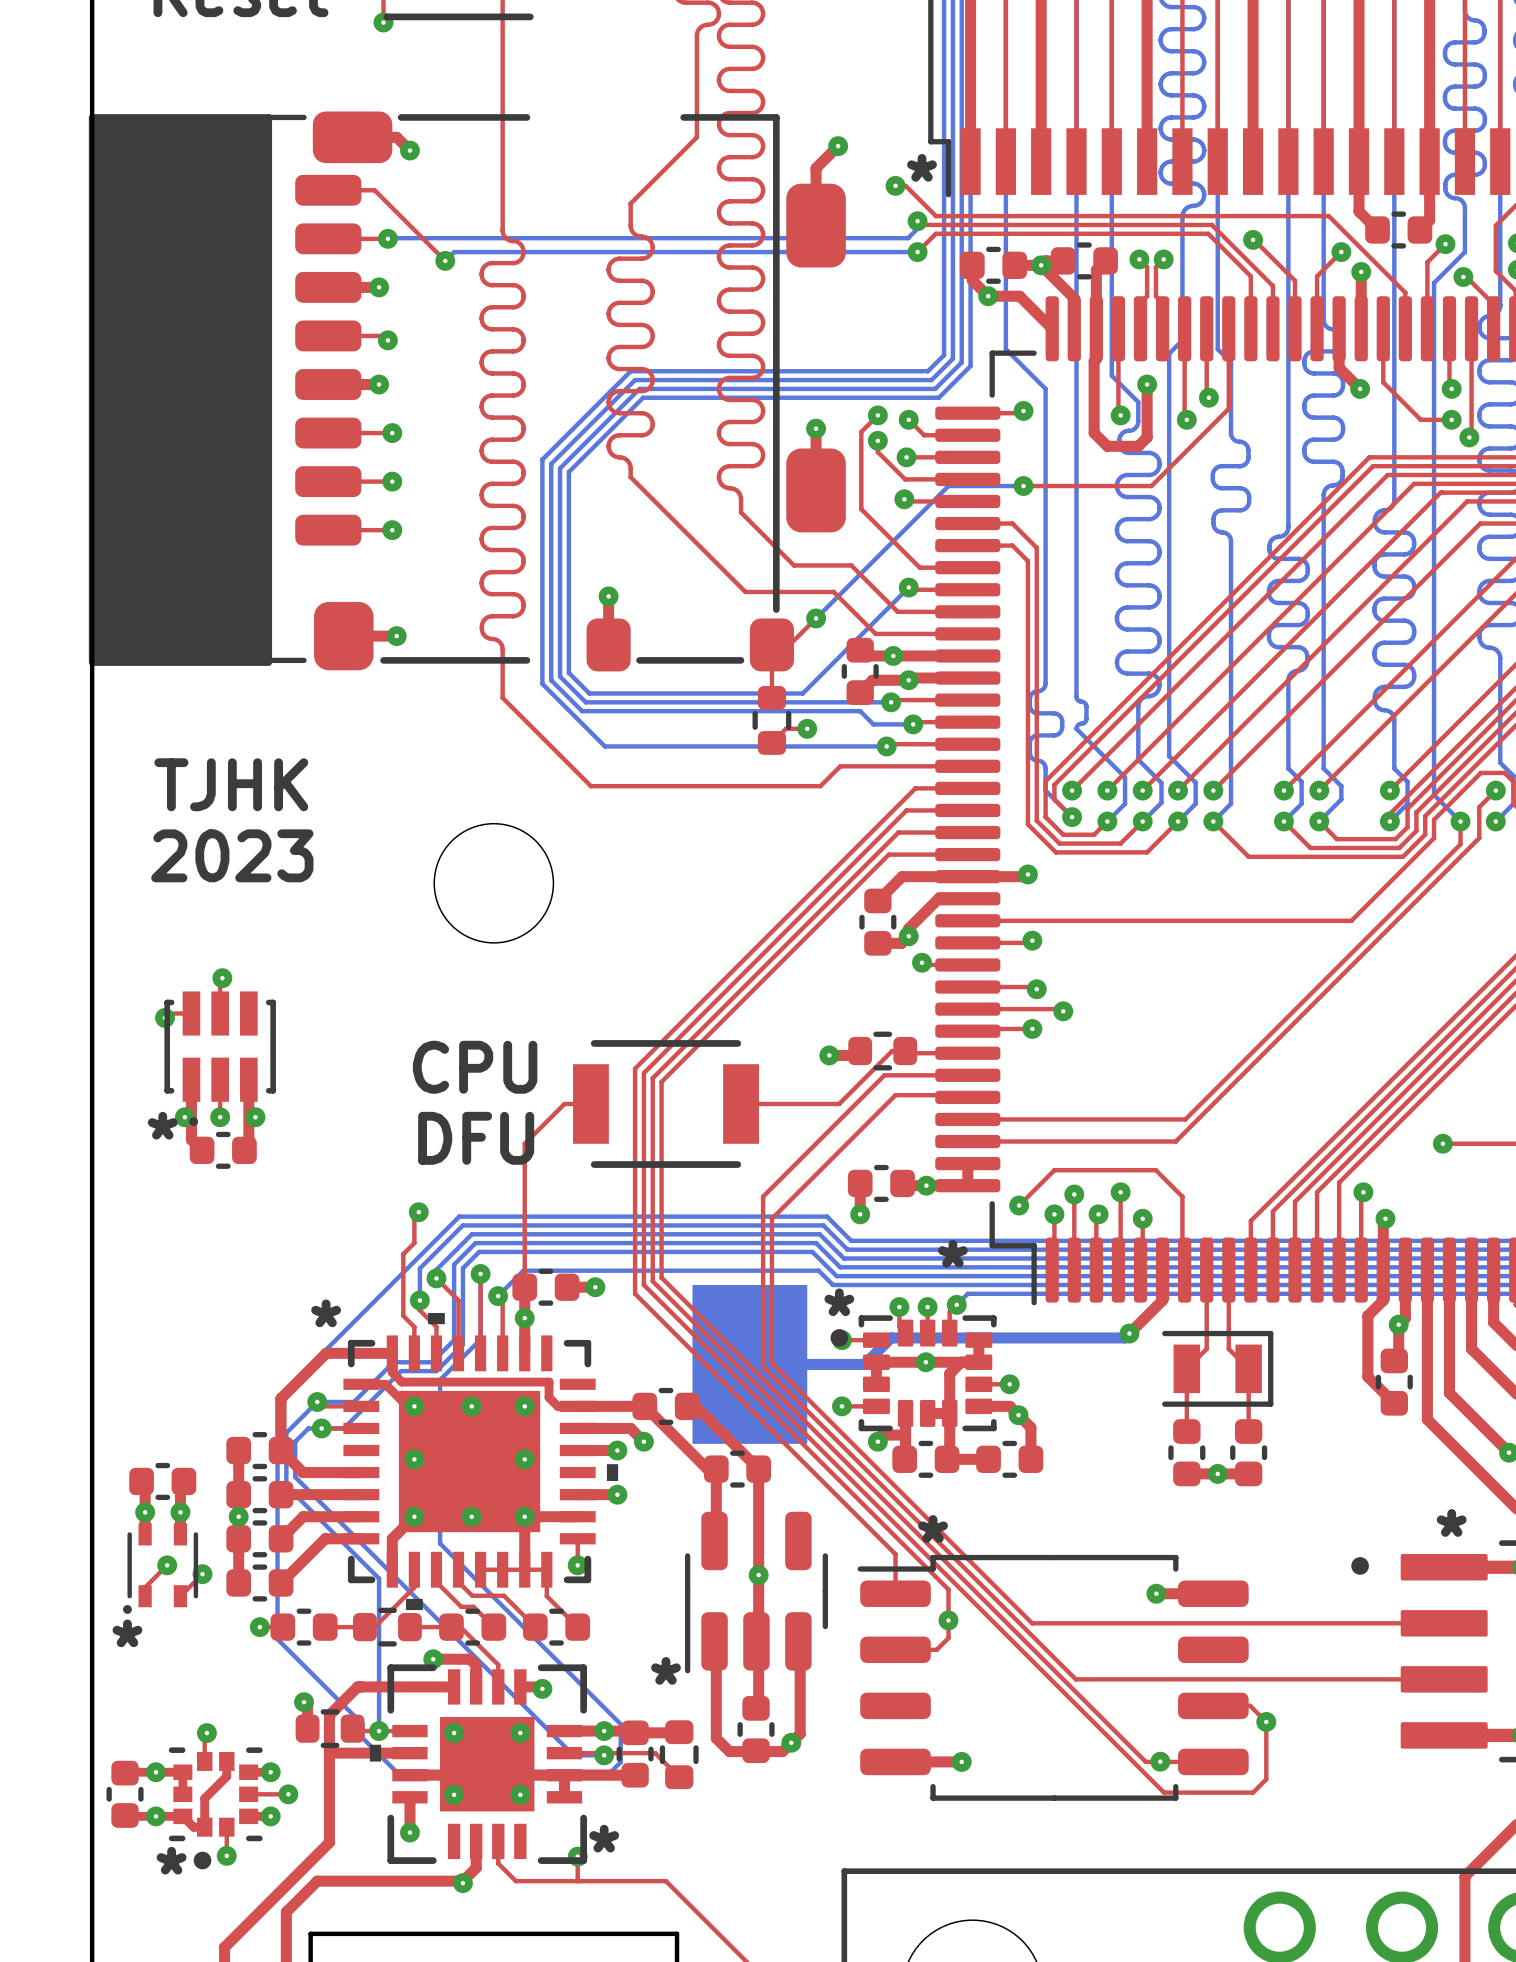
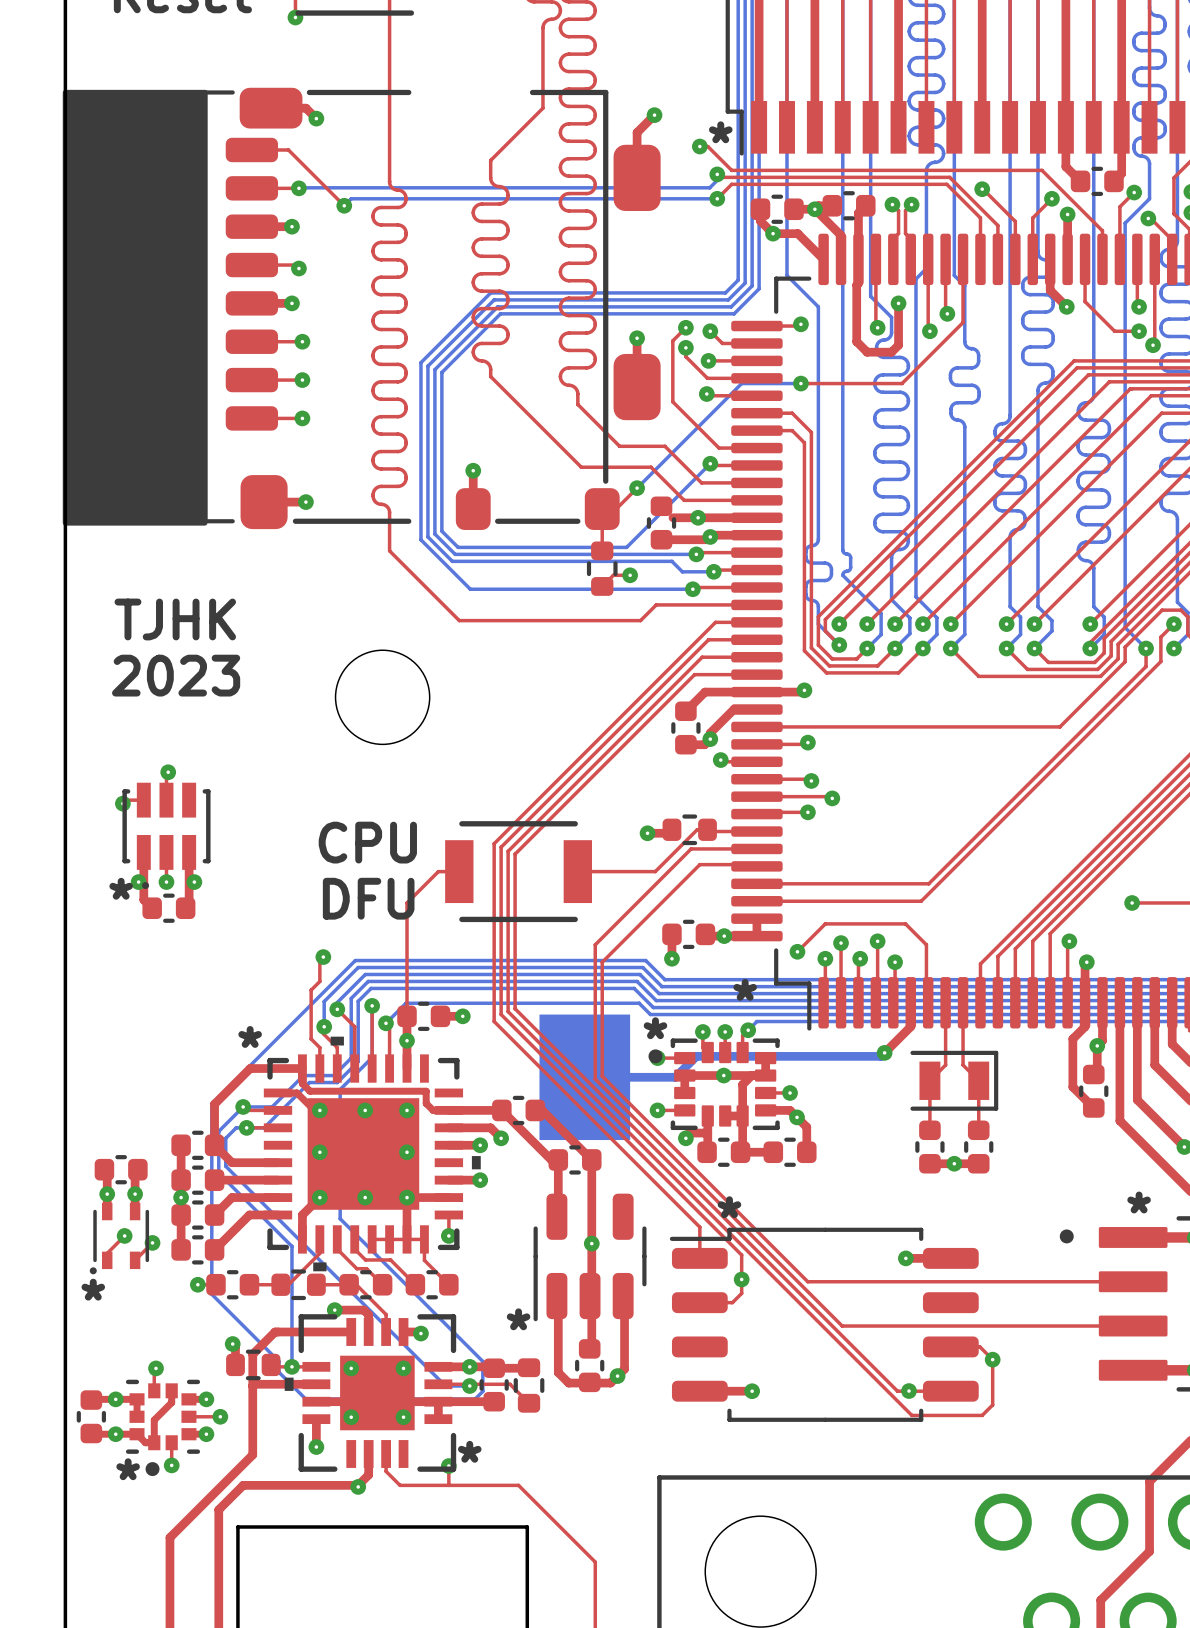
part position: (860, 671) -> (661, 523)
top track: (908, 680) (872, 680) (860, 692) -> (710, 536) (707, 539) (661, 539)

